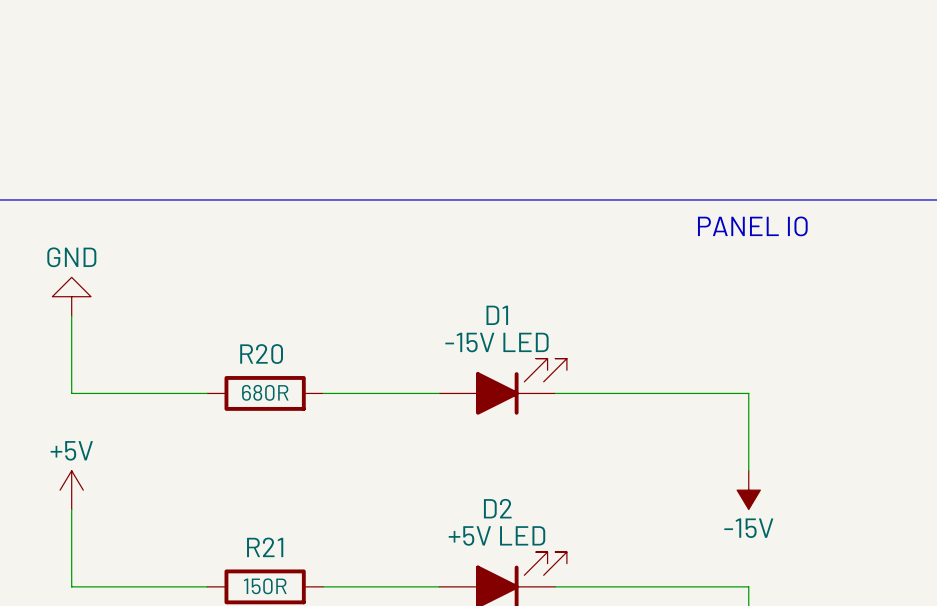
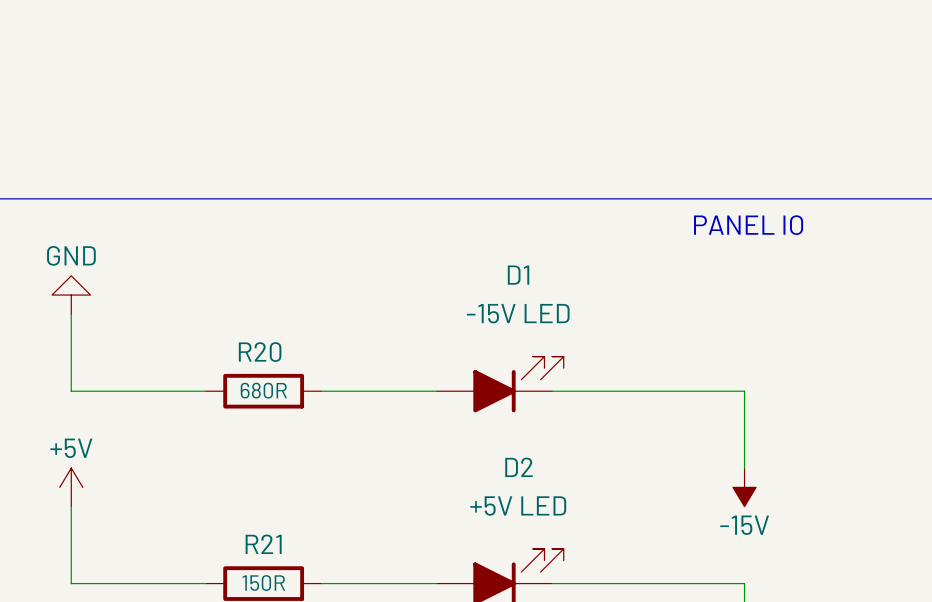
D1 name position: D1 (497, 315) -> D1 (518, 275)
D1 text position: -15V LED (496, 342) -> -15V LED (518, 313)
D2 name position: D2 (497, 508) -> D2 (519, 467)
D2 text position: +5V LED (496, 535) -> +5V LED (518, 506)

